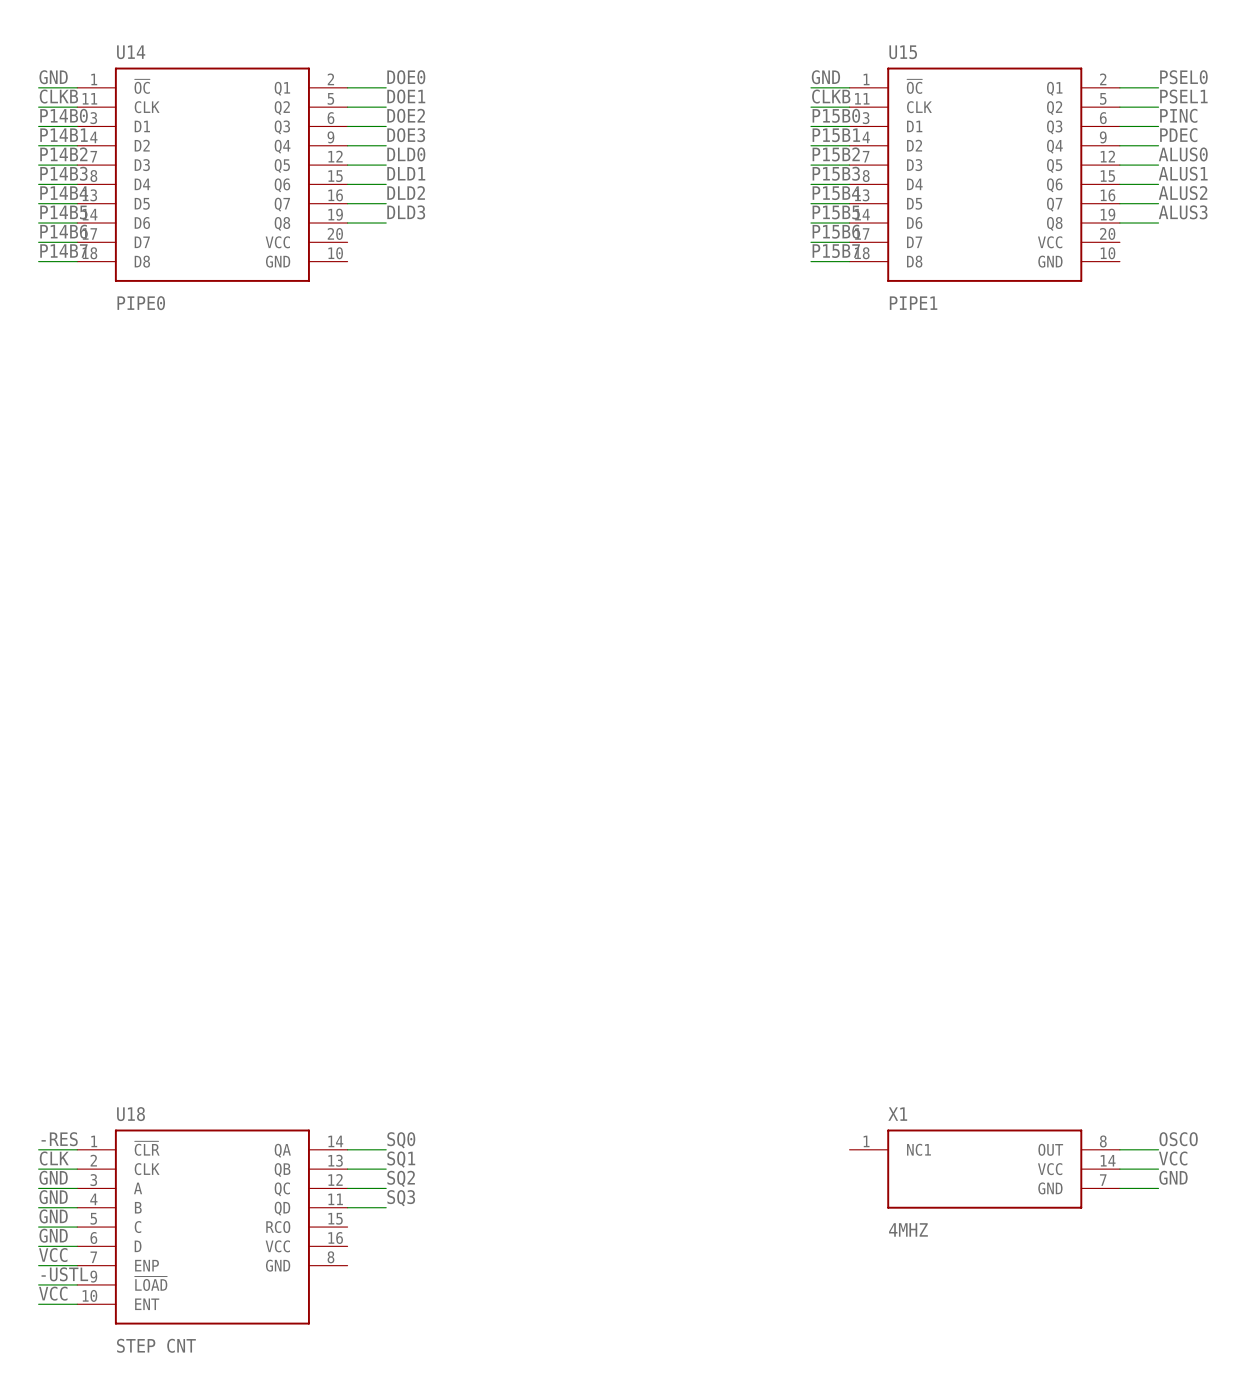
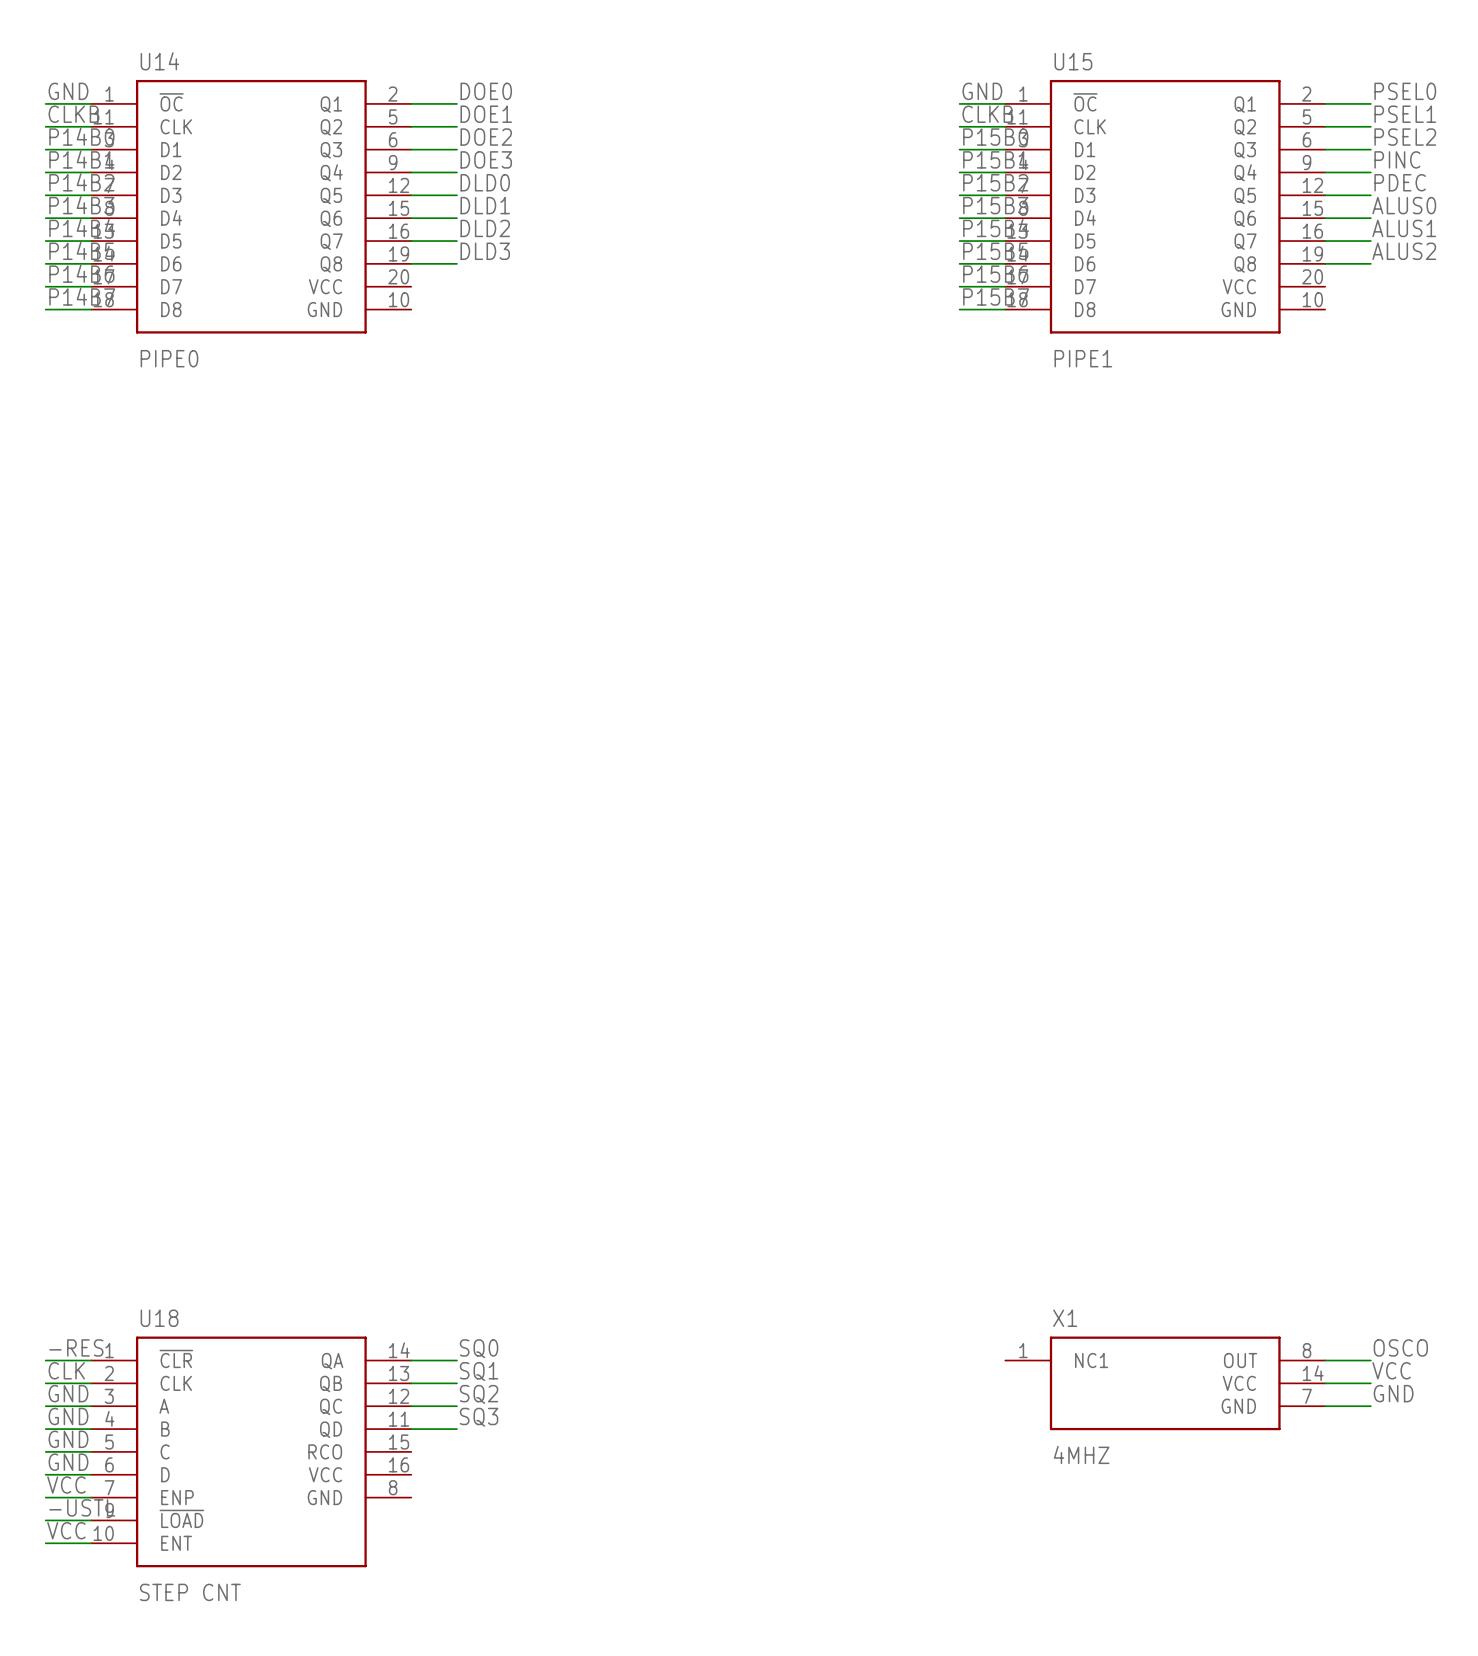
label: PINC (1178, 115) -> PSEL2 (1405, 137)
label: PDEC (1178, 135) -> PINC (1397, 159)
label: ALUS0 (1183, 154) -> PDEC (1400, 182)
label: ALUS1 (1183, 173) -> ALUS0 (1404, 205)
label: ALUS2 (1183, 193) -> ALUS1 (1404, 228)
label: ALUS3 (1183, 212) -> ALUS2 (1404, 251)

